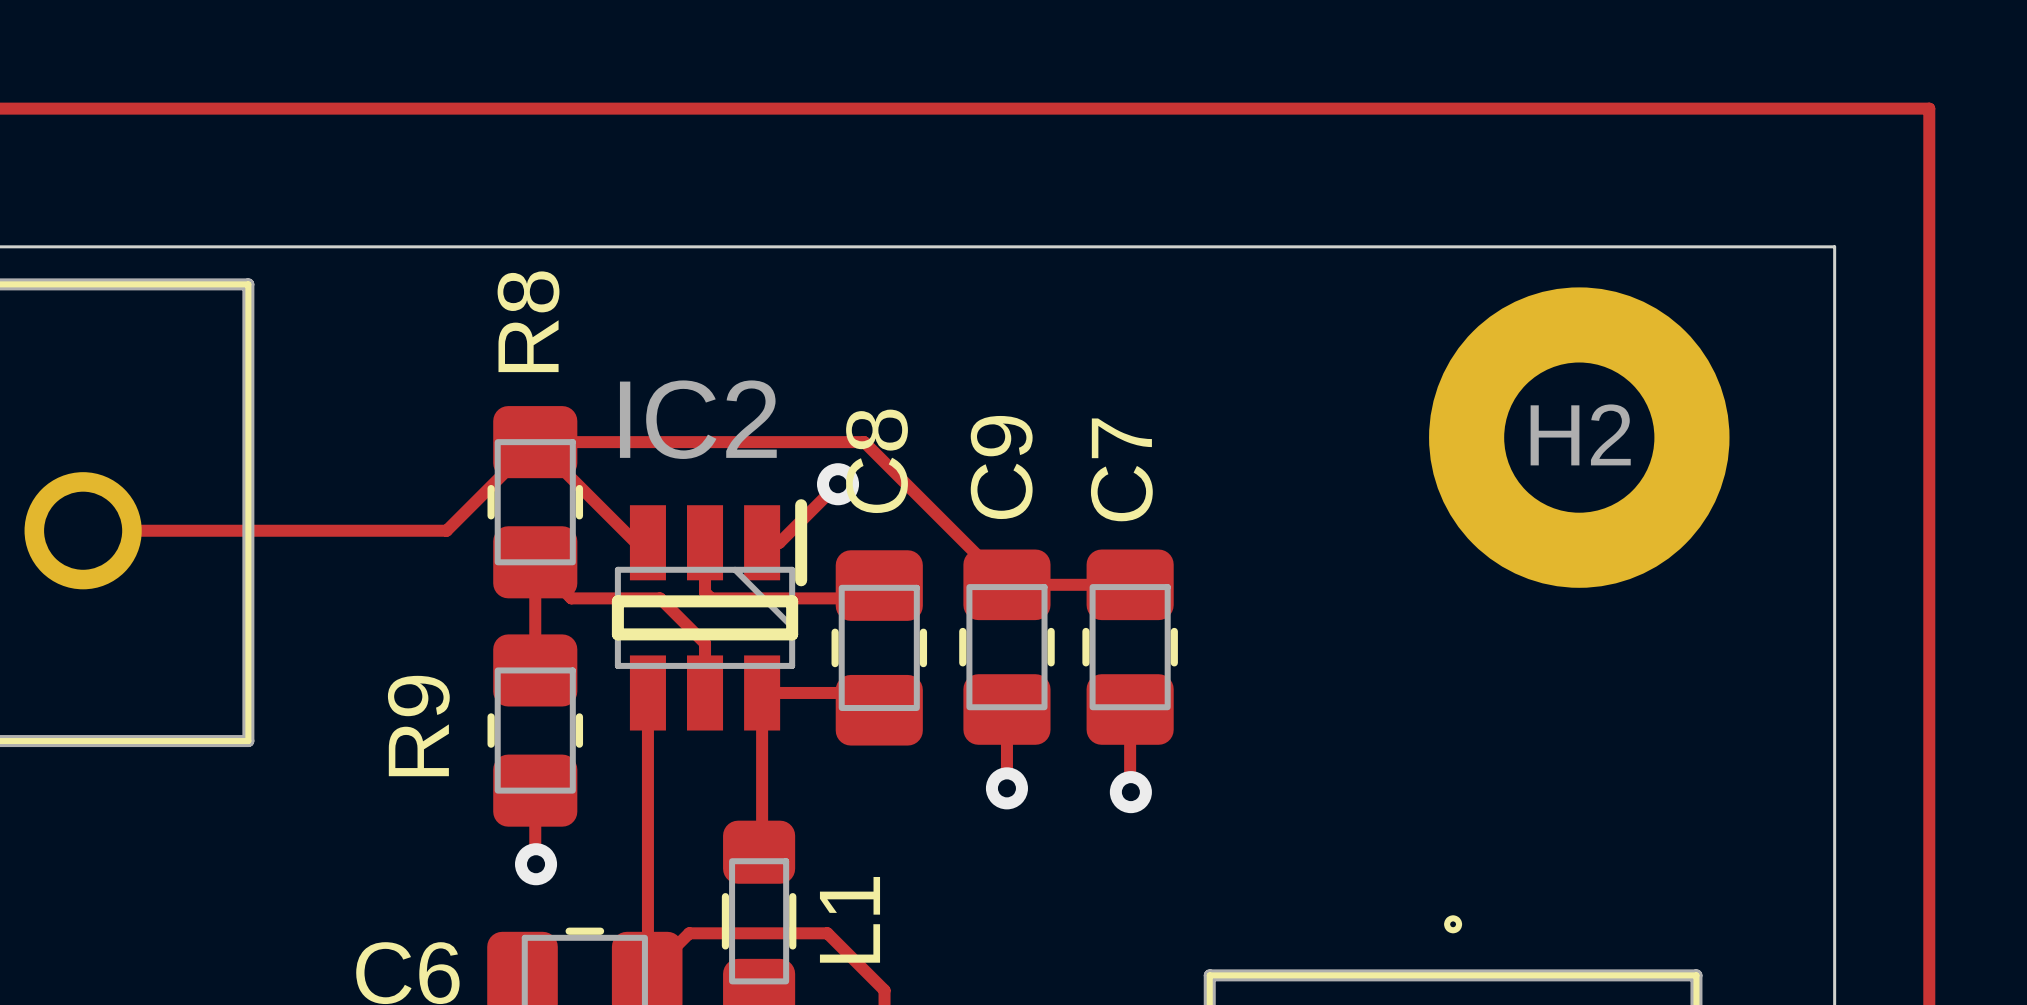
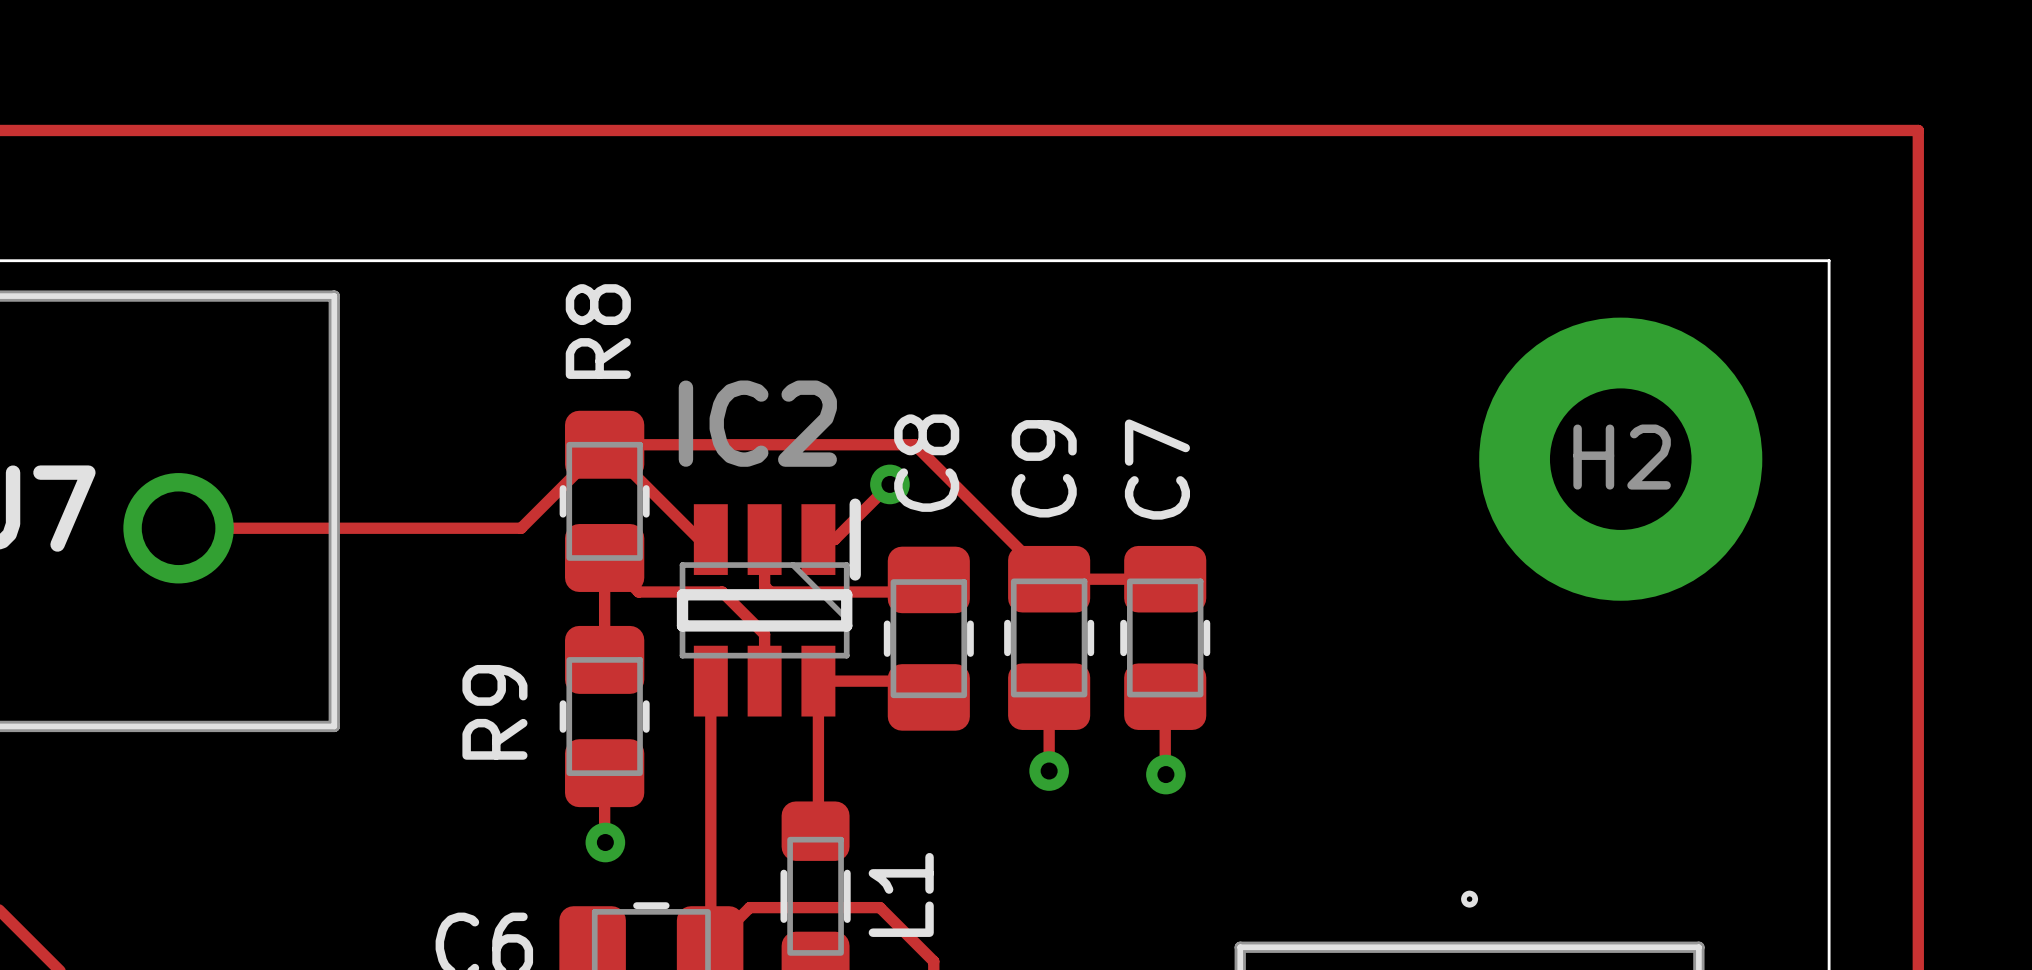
H2 position: (1579, 437) -> (1620, 459)

